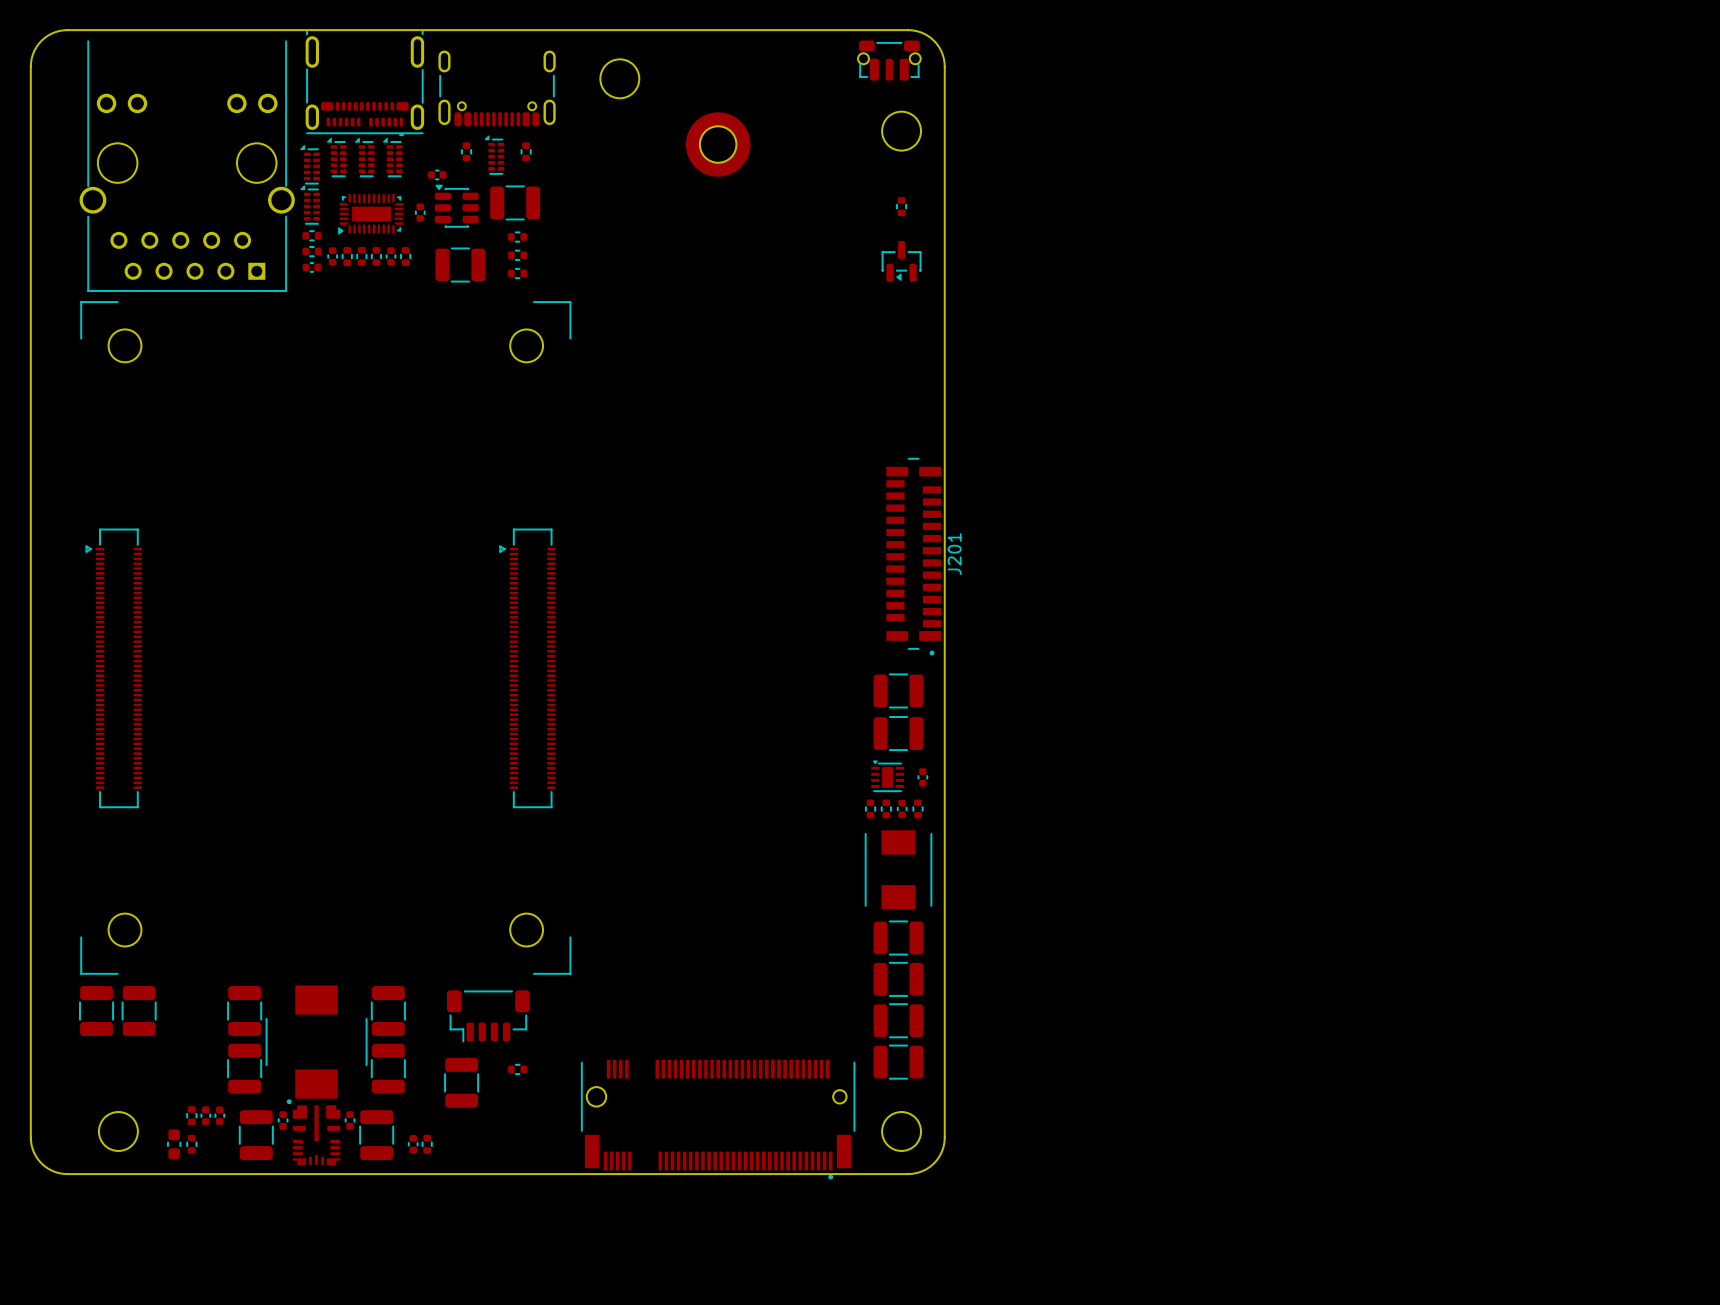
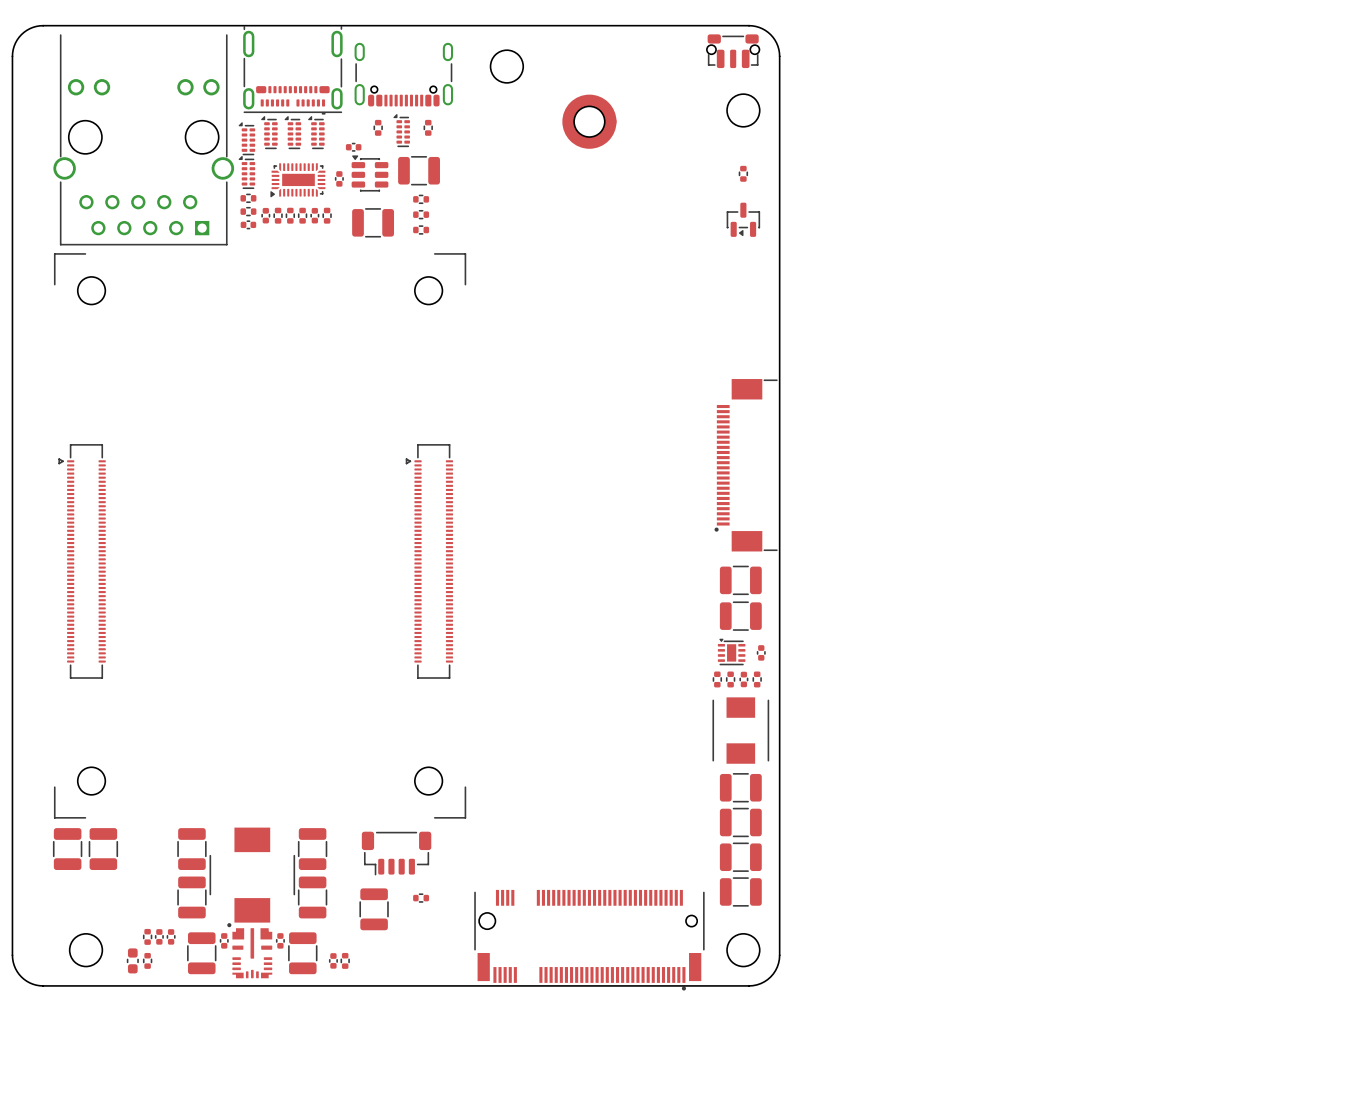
part: none -> (746, 465)
J201: (913, 556) -> none

